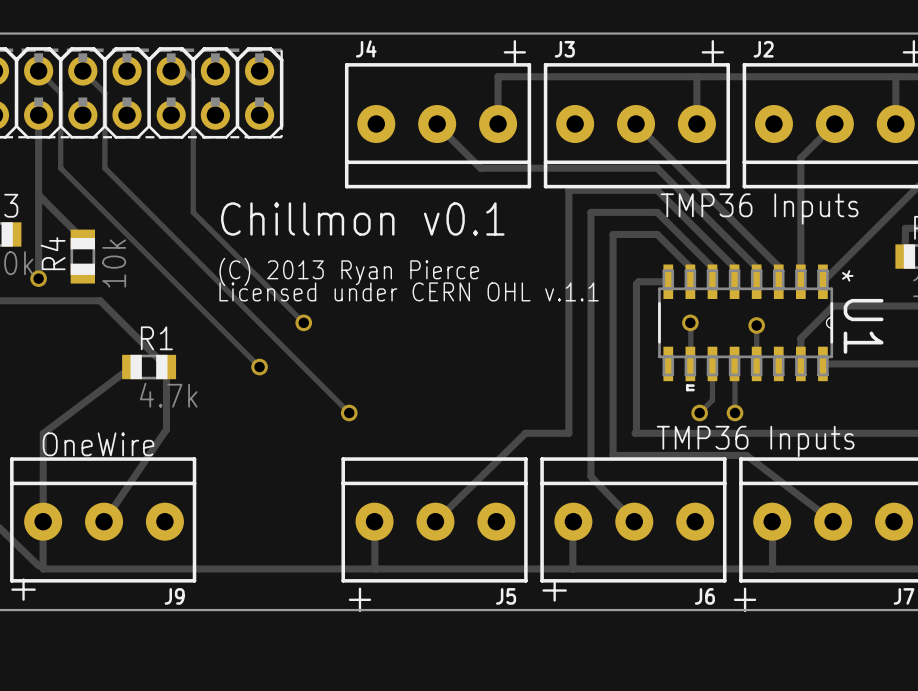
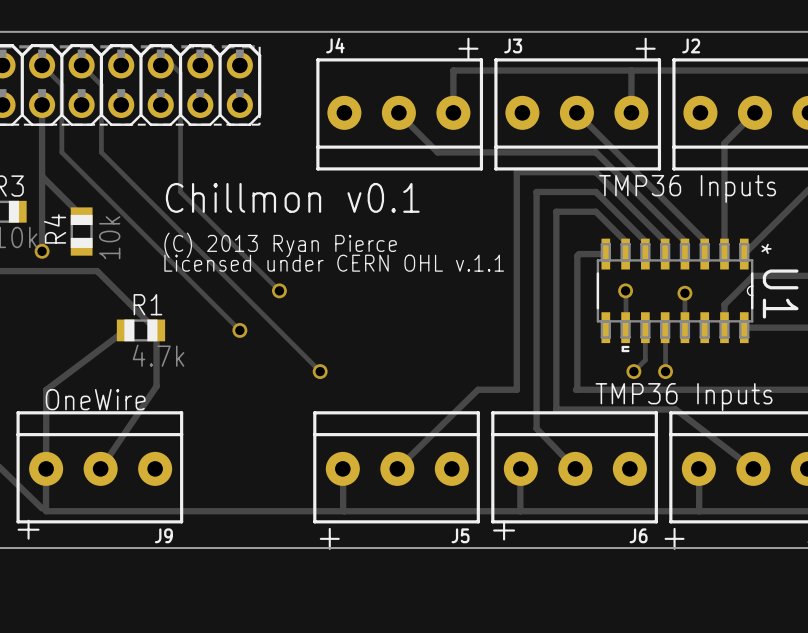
text position: Chillmon v0.1 (362, 219) -> Chillmon v0.1 (292, 197)
text position: (C) 2013 Ryan Pierce (349, 271) -> (C) 2013 Ryan Pierce (280, 245)
text position: Licensed under CERN OHL v.1.1 (409, 291) -> Licensed under CERN OHL v.1.1 (334, 263)

